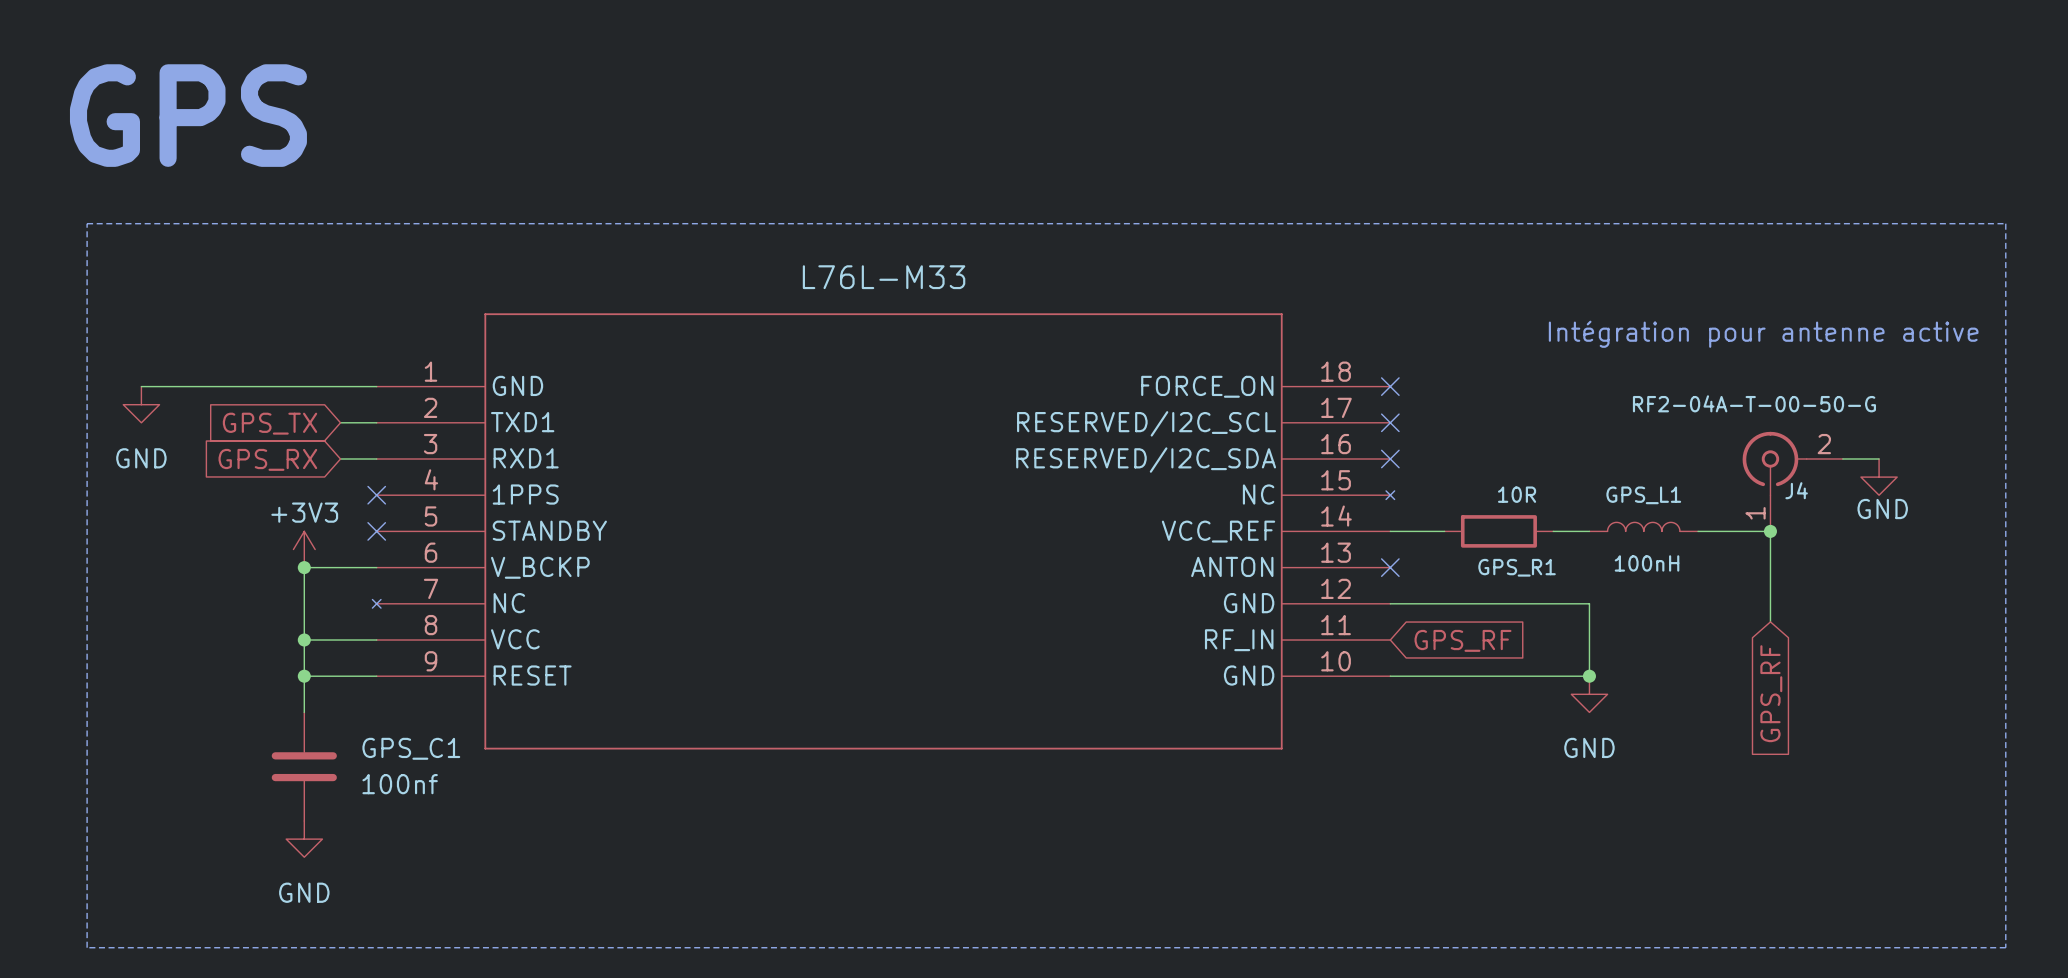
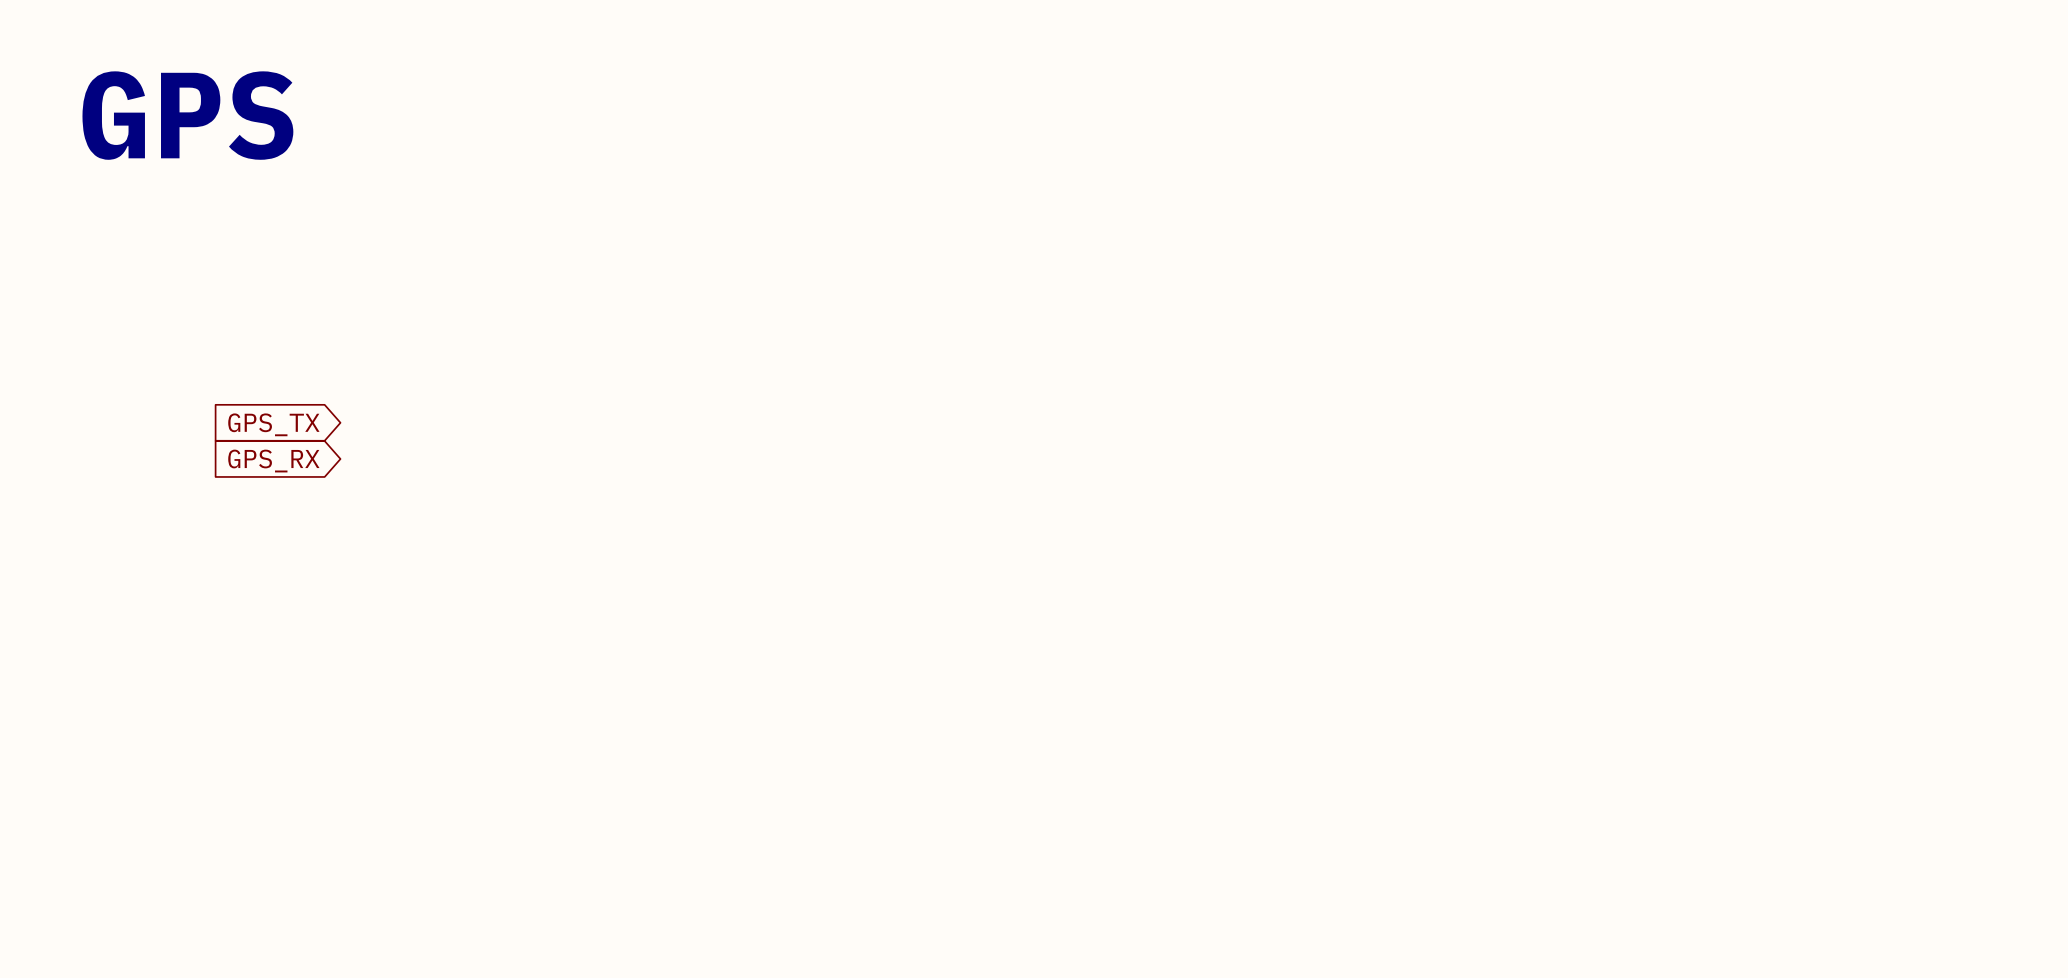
line: (87, 223) (2005, 223) (2005, 947) (87, 947) (87, 223) -> none
text: Intégration pour antenne active (1763, 334) -> none
wire: (141, 386) (376, 386) -> none
no-connect mark: (1390, 386) -> none
power symbol: GND (141, 404) -> none
wire: (340, 422) (376, 422) -> none
no-connect mark: (1390, 422) -> none
wire: (340, 459) (376, 459) -> none
no-connect mark: (1390, 459) -> none
wire: (1842, 459) (1879, 459) -> none
power symbol: GND (1879, 477) -> none
J4: RF2-04A-T-00-50-G (1792, 481) -> none
no-connect mark: (376, 495) -> none
GPS_L1: 100nH (1643, 526) -> none
no-connect mark: (376, 531) -> none
part: L76L-M33 (883, 531) -> none
wire: (1390, 531) (1444, 531) -> none
GPS_R1: 10R (1498, 531) -> none
wire: (1553, 531) (1589, 531) -> none
wire: (1698, 531) (1770, 531) (1770, 621) -> none
junction: (1770, 531) -> none
power symbol: +3V3 (304, 549) -> none
junction: (304, 567) -> none
wire: (376, 567) (304, 567) (304, 712) -> none
no-connect mark: (1390, 567) -> none
wire: (1390, 603) (1589, 603) (1589, 676) (1390, 676) -> none
wire: (304, 640) (376, 640) -> none
junction: (304, 640) -> none
global label: GPS_RF (1462, 640) -> none
wire: (304, 676) (376, 676) -> none
junction: (304, 676) -> none
junction: (1589, 676) -> none
global label: GPS_RF (1771, 693) -> none
power symbol: GND (1589, 694) -> none
GPS_C1: 100nf (304, 766) -> none
power symbol: GND (304, 839) -> none

